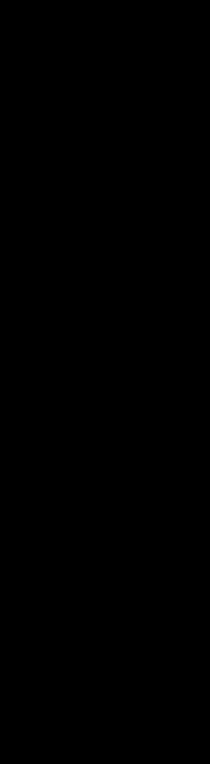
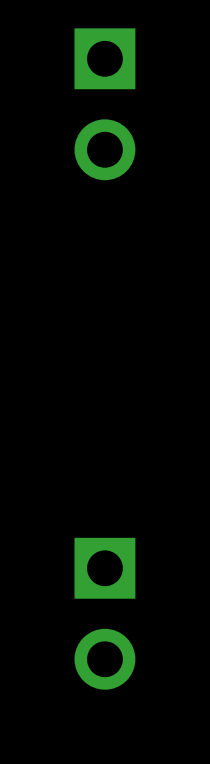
part: none -> (104, 104)
part: none -> (104, 613)

